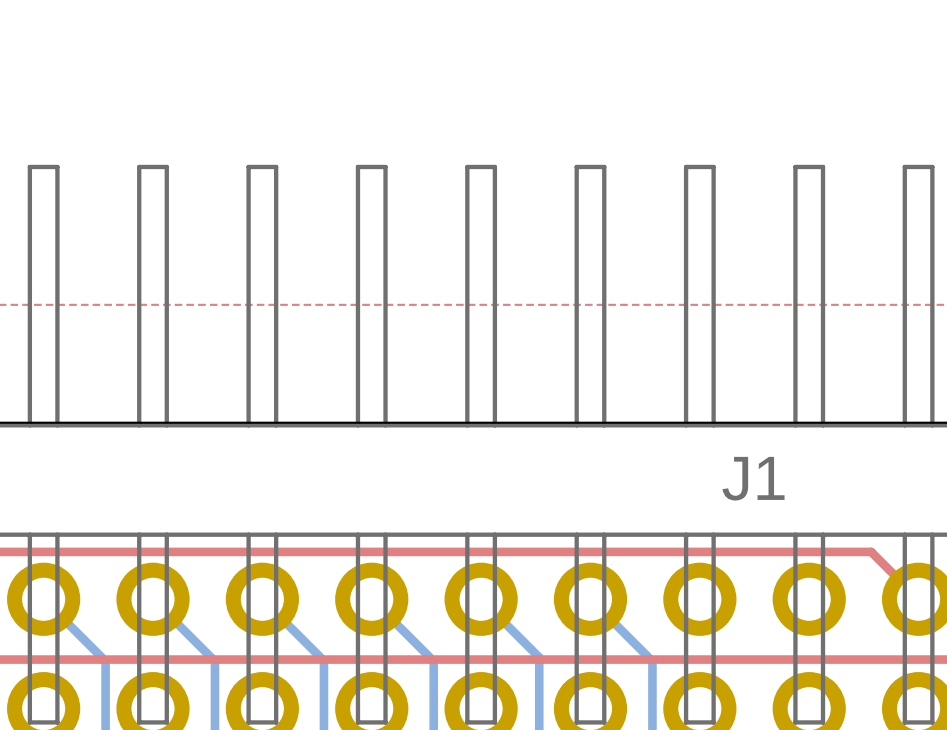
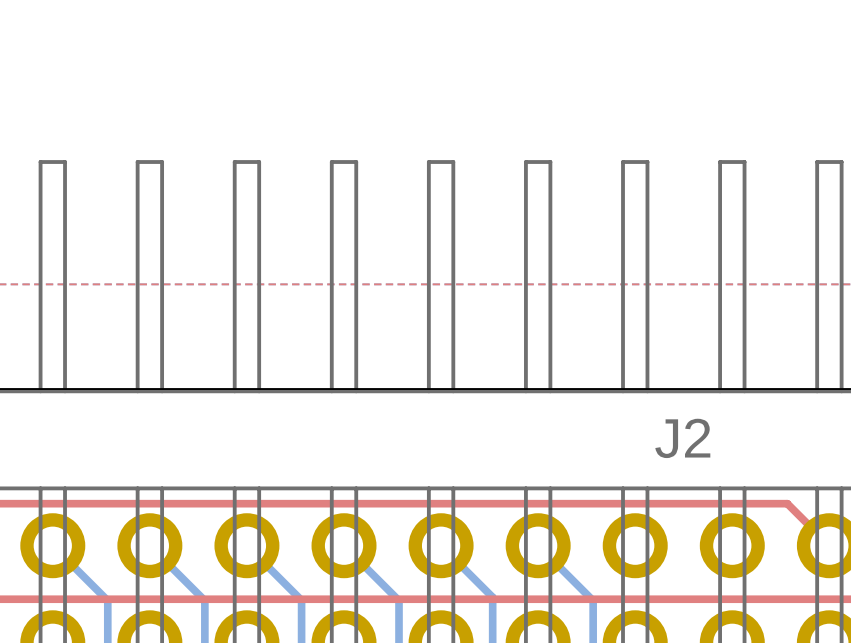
J1 name: J1 (753, 478) -> J2 (682, 438)

